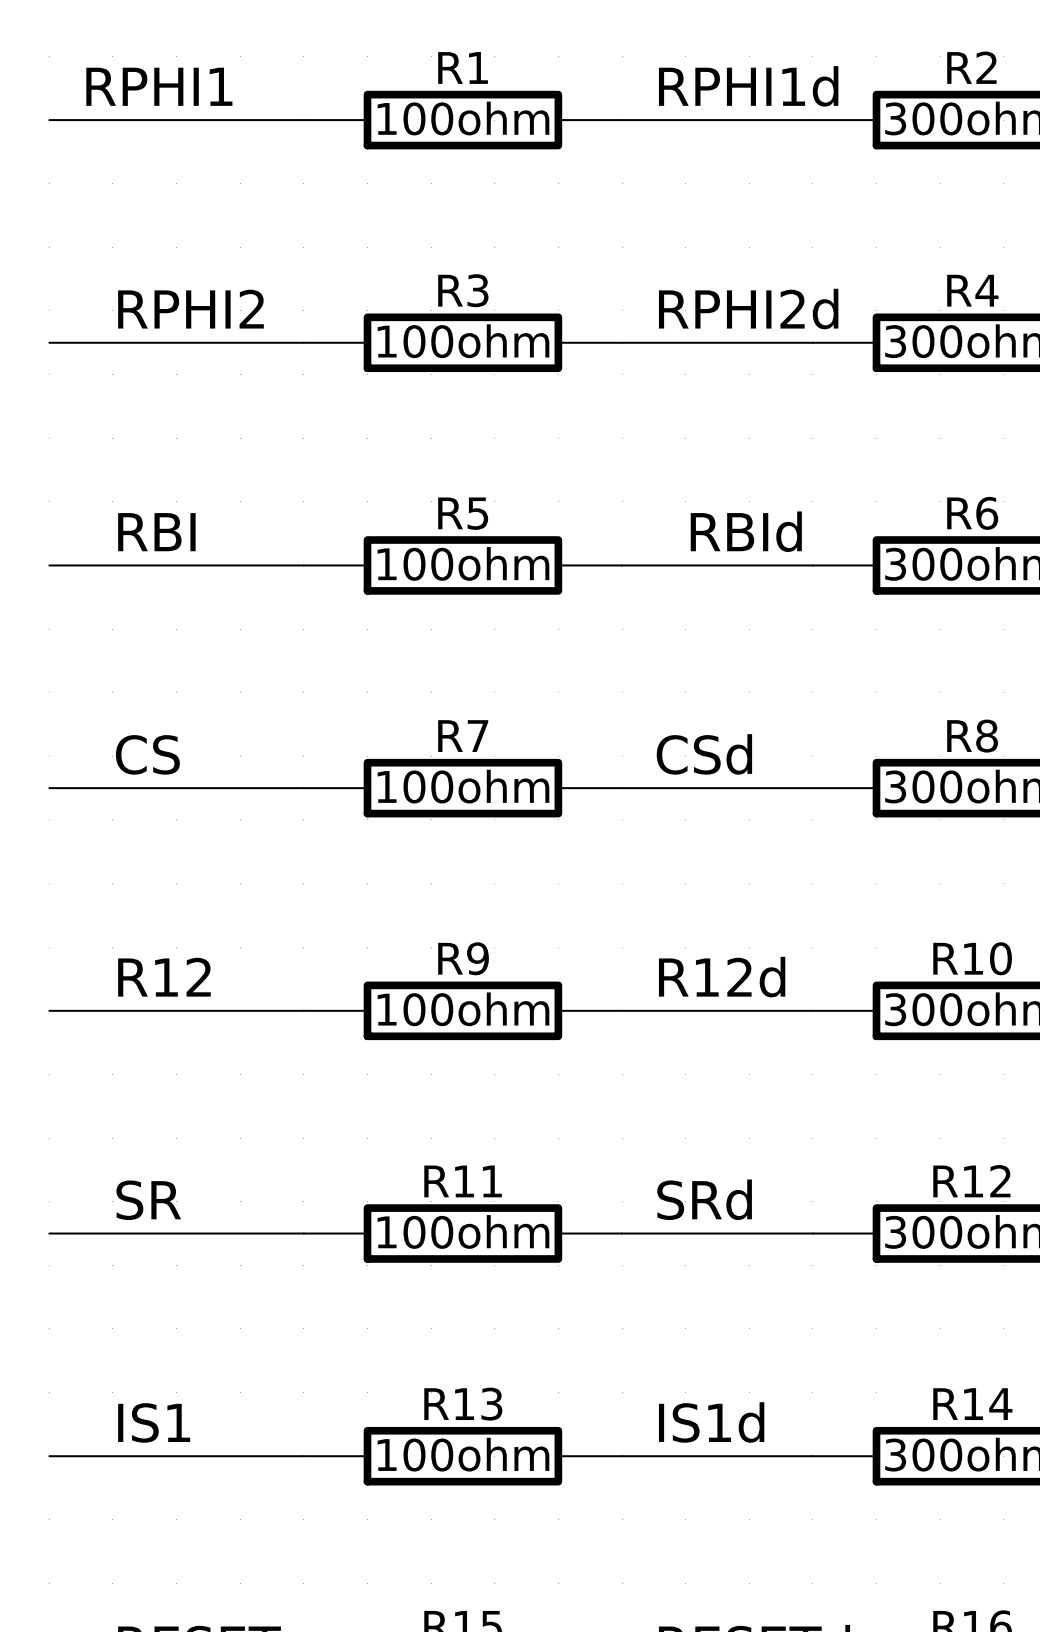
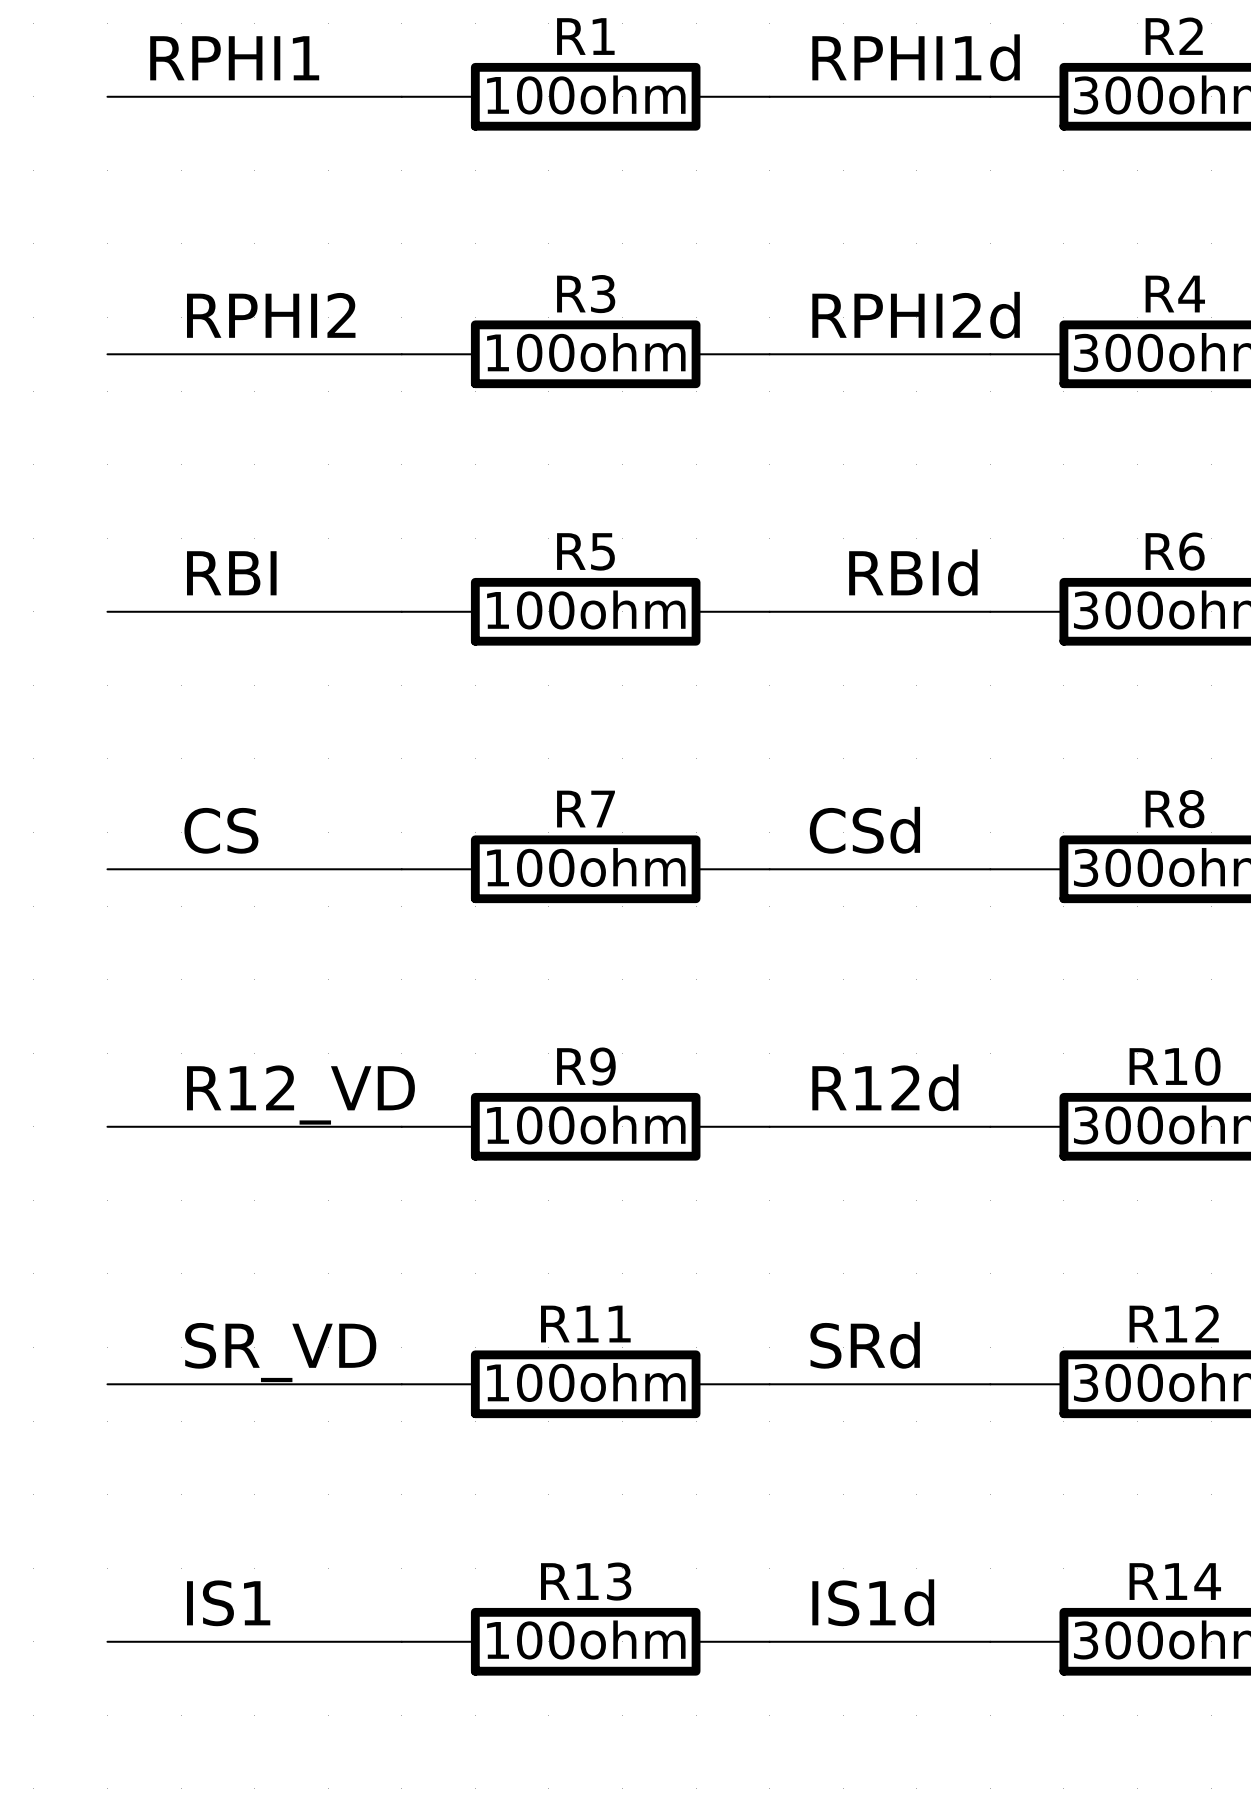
label: R12 (164, 977) -> R12_VD (300, 1095)
label: SR (148, 1200) -> SR_VD (280, 1352)

